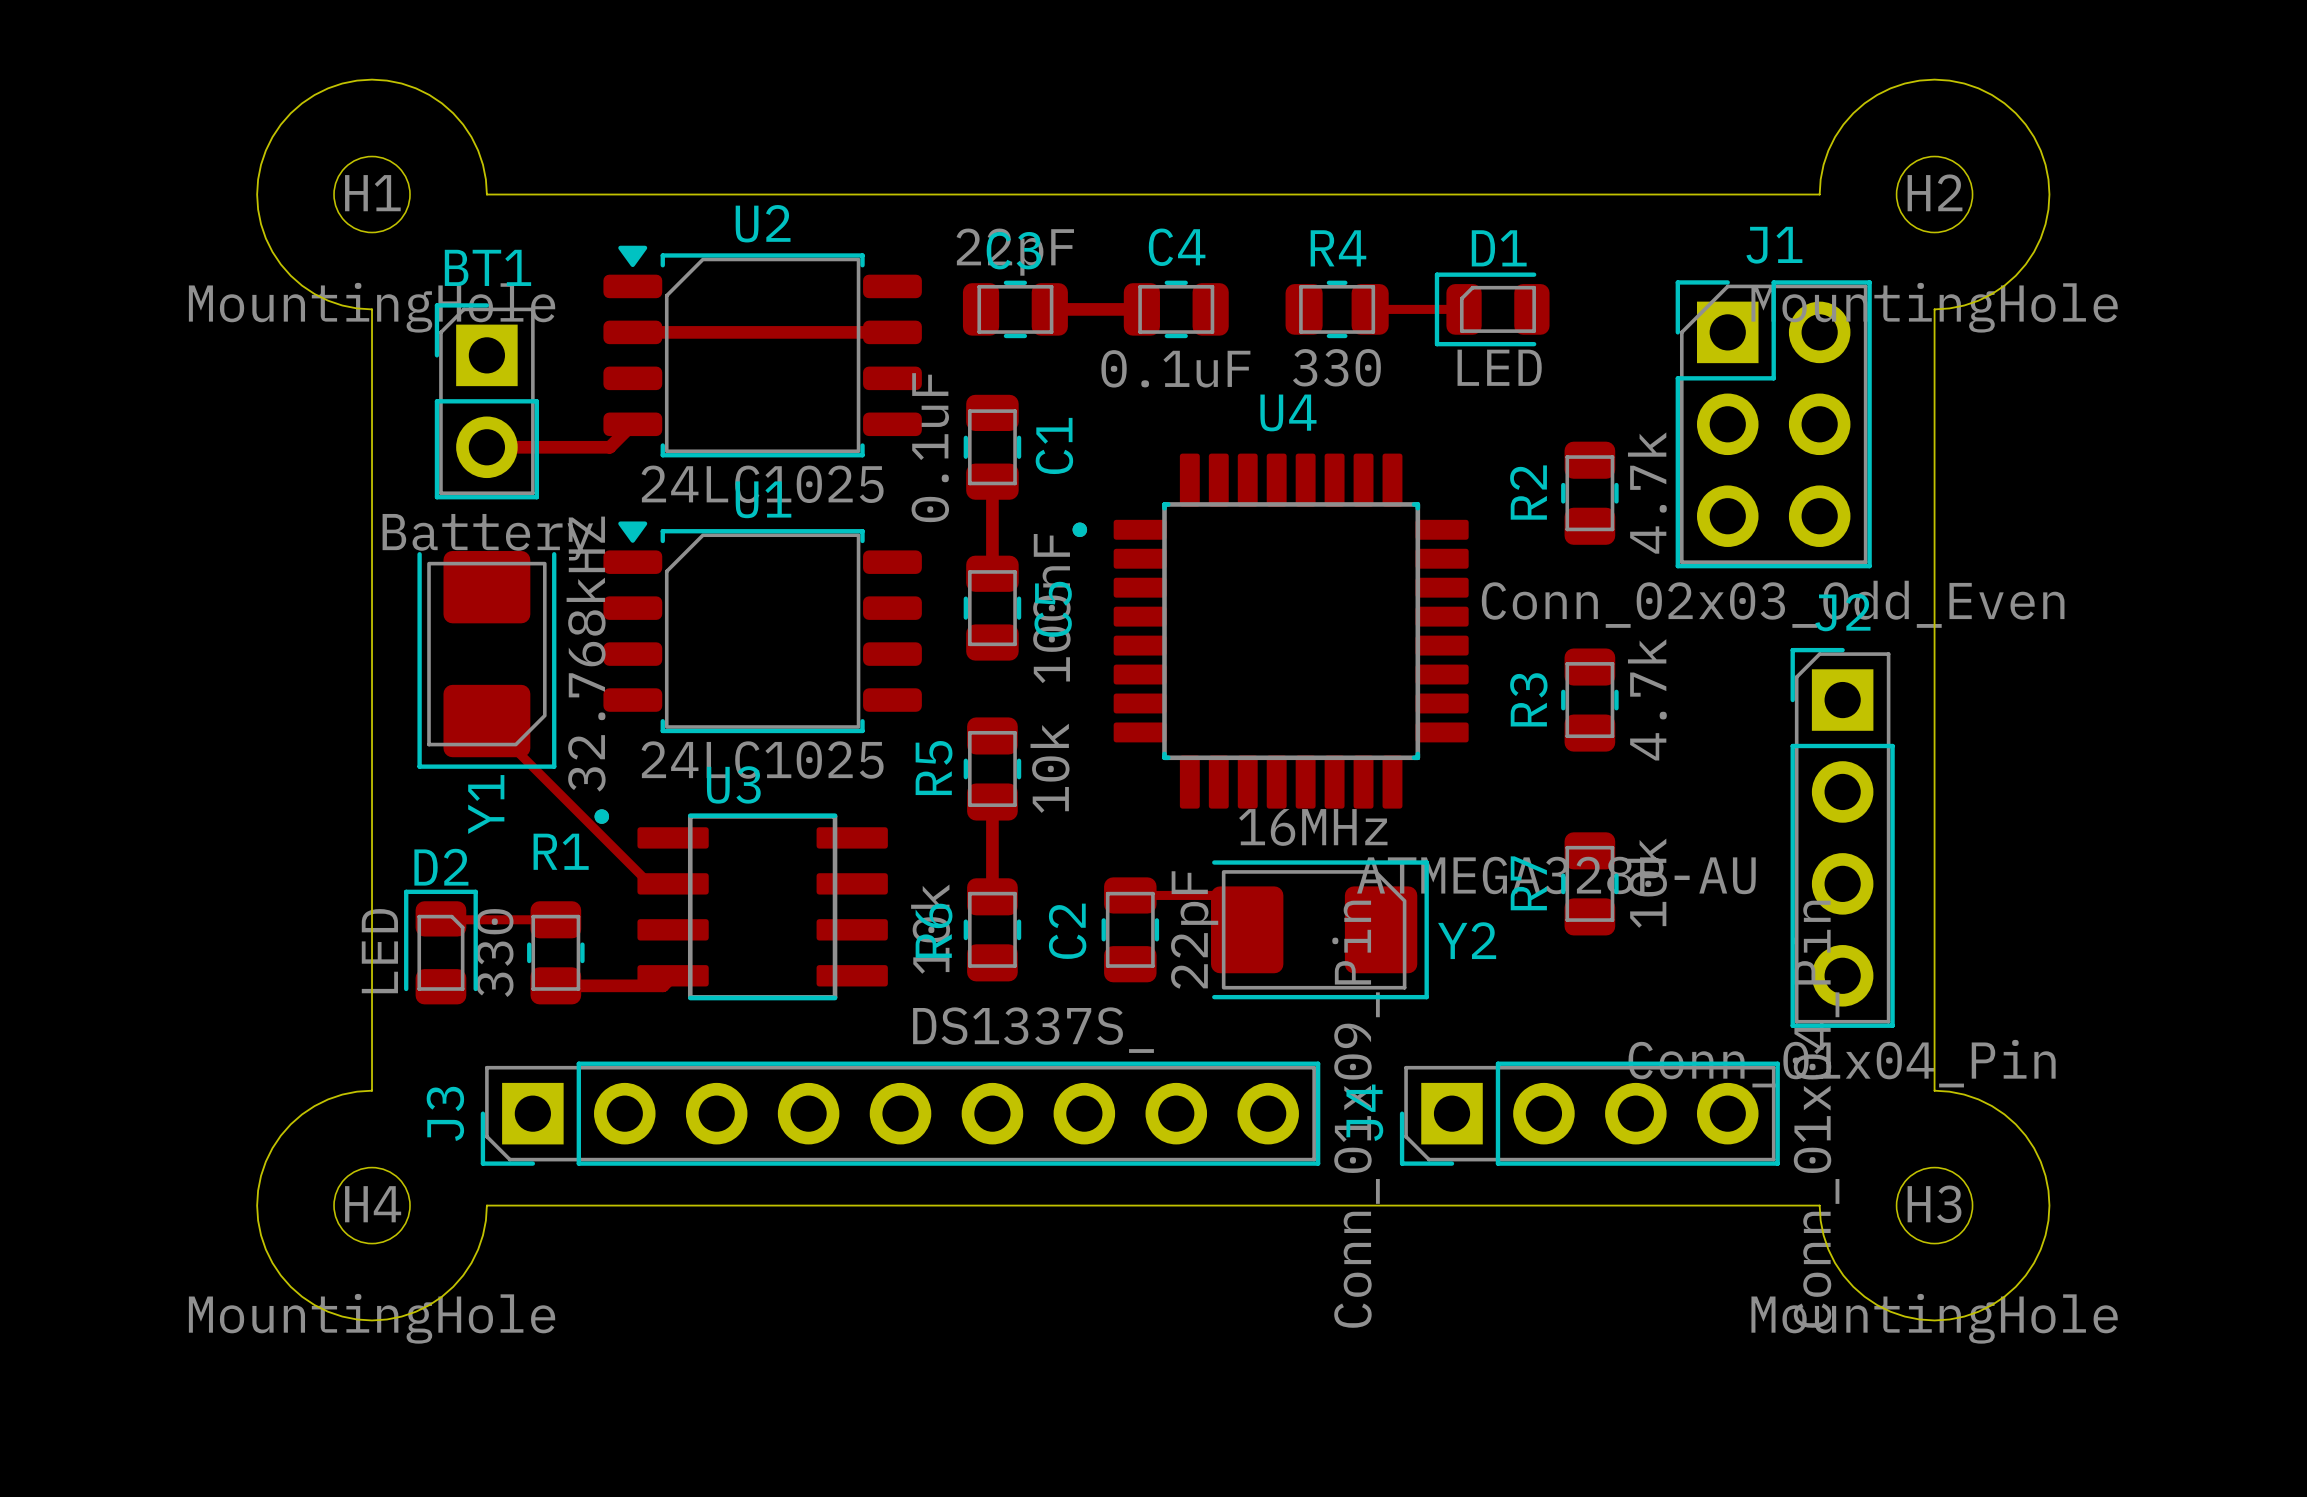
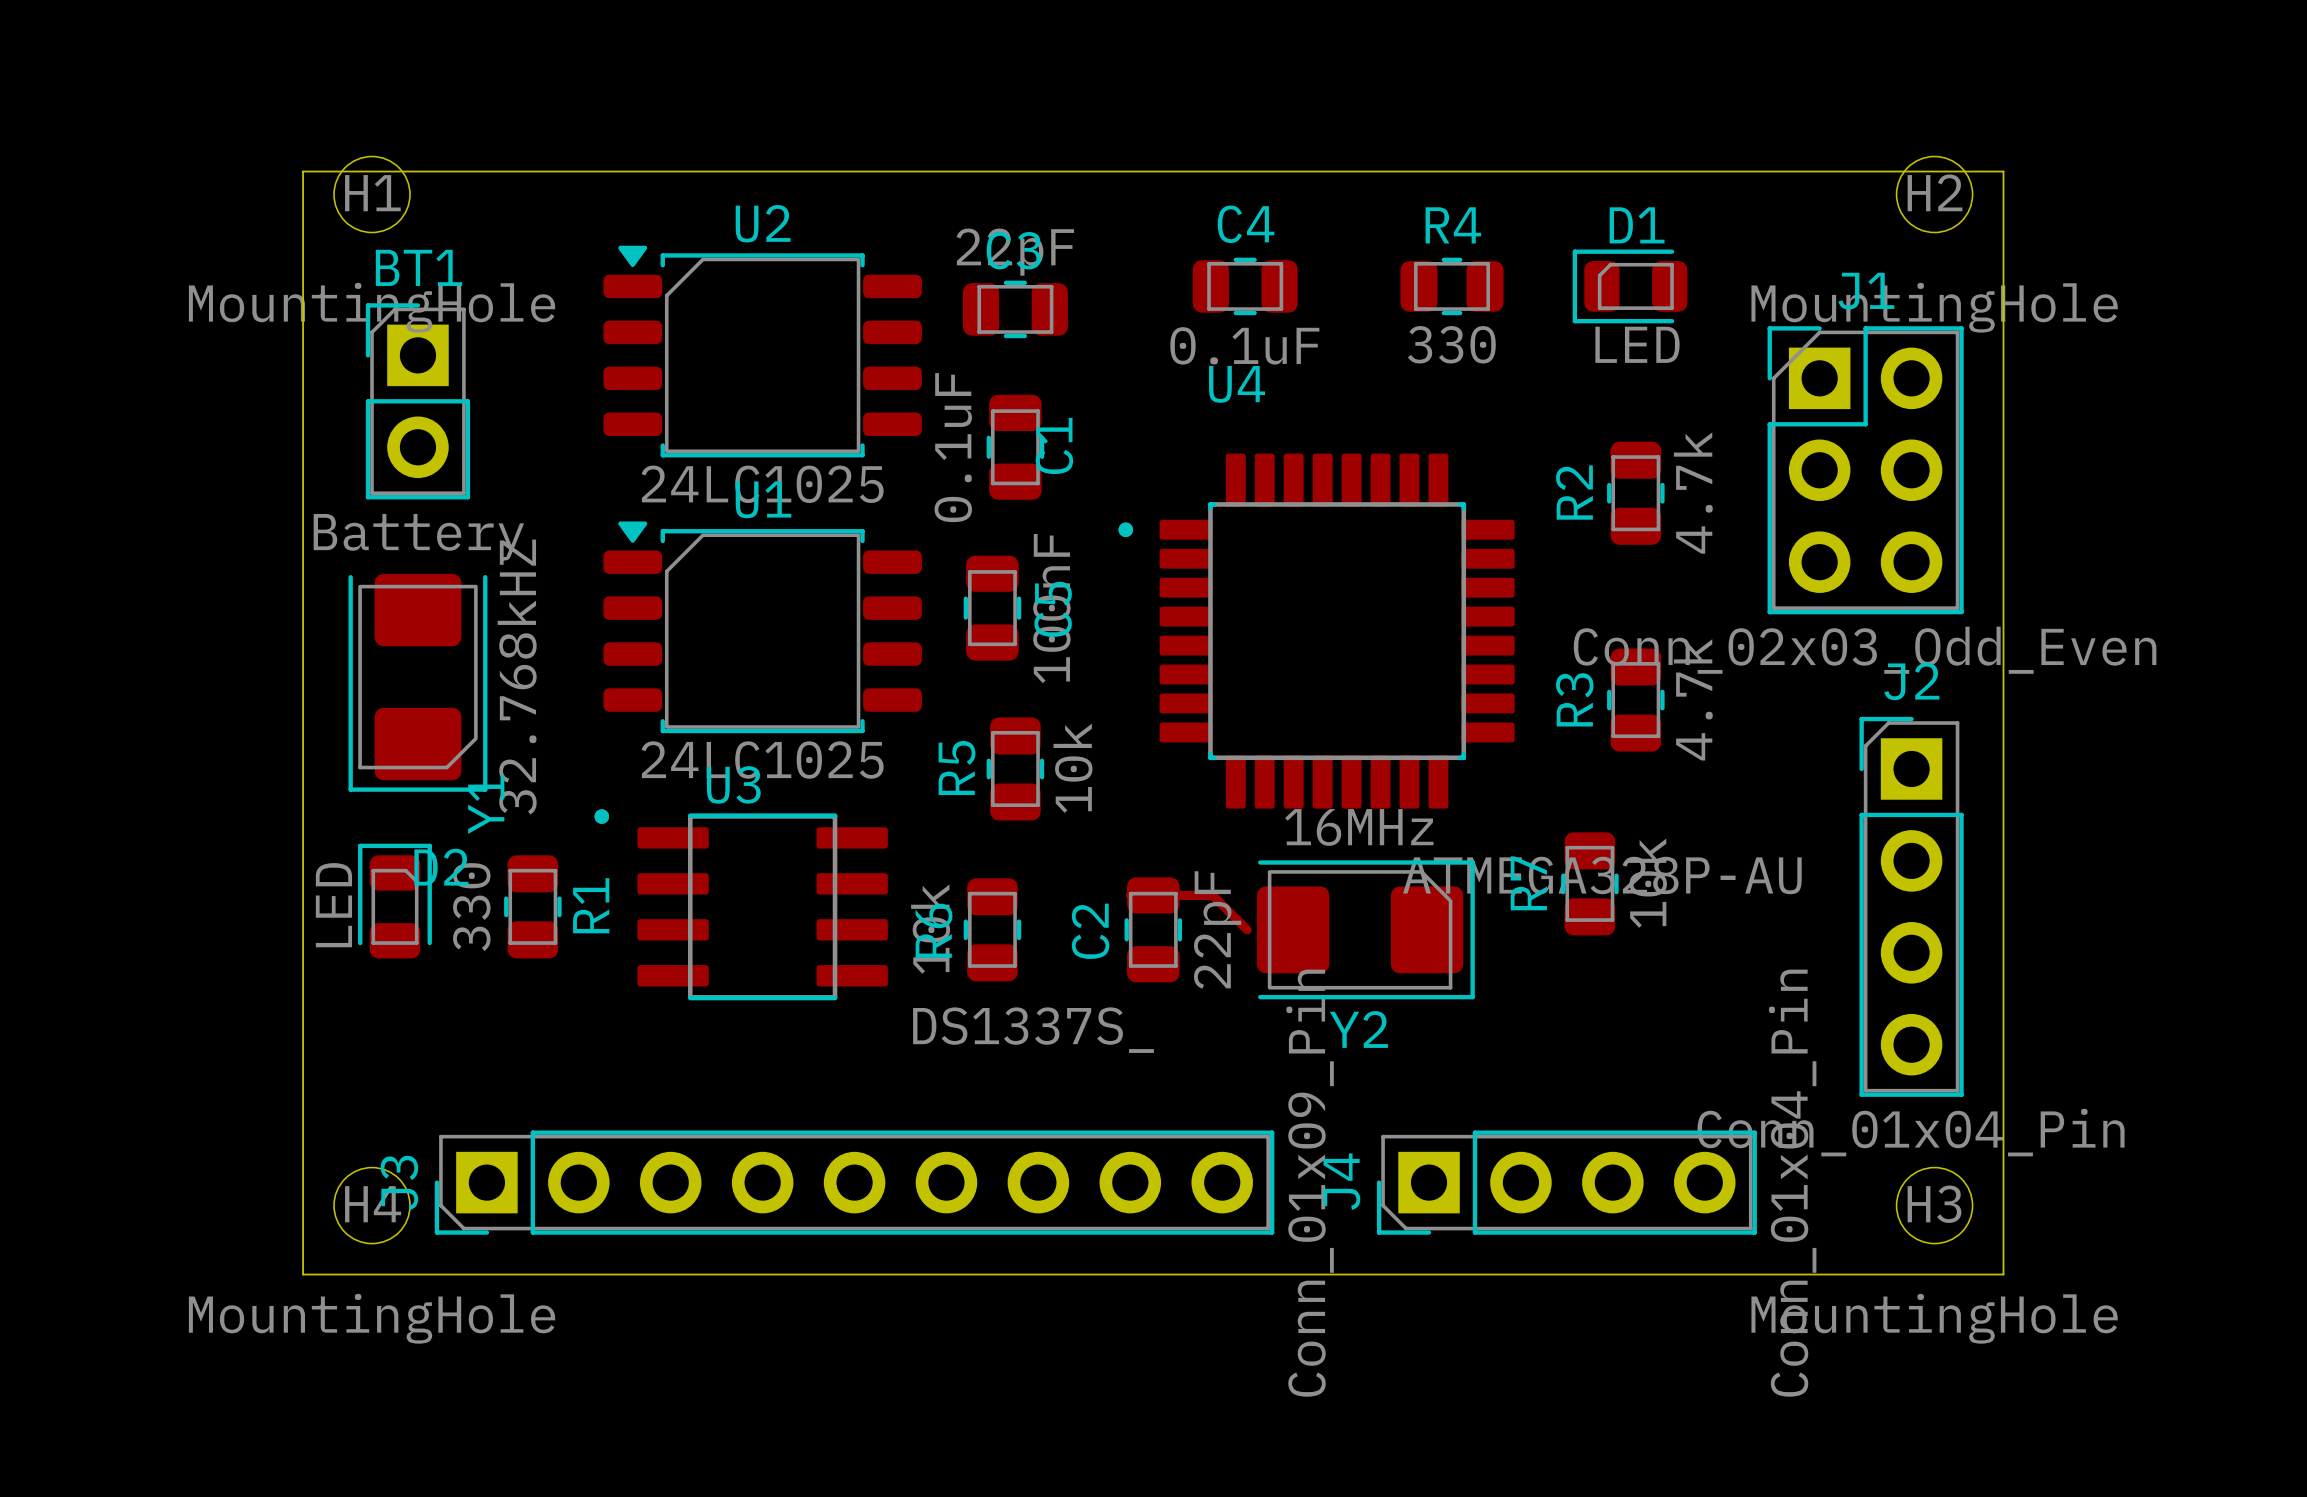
board edge: (486, 194) (1819, 194) (1820, 179) (1828, 150) (1843, 124) (1864, 103) (1890, 88) (1919, 80) (1949, 80) (1978, 88) (2004, 103) (2025, 124) (2040, 150) (2045, 164) (2049, 194) (2045, 224) (2034, 251) (2015, 275) (2004, 285) (1978, 300) (1964, 305) (1934, 309) (1934, 1090) (1964, 1094) (1992, 1106) (2015, 1124) (2025, 1135) (2040, 1161) (2048, 1190) (2048, 1220) (2040, 1249) (2025, 1275) (2004, 1296) (1992, 1305) (1964, 1316) (1934, 1320) (1904, 1316) (1877, 1305) (1853, 1286) (1843, 1275) (1828, 1249) (1823, 1235) (1819, 1205) (486, 1205) (482, 1235) (471, 1263) (463, 1275) (441, 1296) (415, 1311) (387, 1319) (357, 1319) (328, 1311) (302, 1296) (280, 1275) (272, 1263) (261, 1235) (257, 1205) (261, 1175) (272, 1148) (290, 1124) (302, 1114) (314, 1106) (342, 1094) (372, 1090) (372, 309) (342, 305) (328, 300) (314, 294) (290, 275) (272, 251) (265, 238) (258, 209) (258, 179) (265, 150) (272, 137) (290, 113) (314, 95) (328, 88) (357, 80) (372, 79) (401, 83) (415, 88) (429, 95) (453, 113) (471, 137) (478, 150) (485, 179) (486, 194) -> (303, 171) (303, 1274) (2003, 1274) (2003, 171) (303, 171)
top track: (1049, 309) (1141, 309) -> none
C4 position: (1176, 309) -> (1245, 286)
R4 position: (1337, 309) -> (1452, 286)
top track: (1370, 309) (1464, 309) -> none
D1 position: (1492, 309) -> (1630, 286)
top track: (632, 332) (892, 332) -> none
BT1 position: (486, 401) -> (417, 401)
U4 name position: U4 (1288, 412) -> U4 (1237, 384)
top track: (632, 424) (609, 447) (486, 447) -> none
J1 position: (1773, 424) -> (1865, 470)
C1 position: (992, 447) -> (1015, 447)
top track: (992, 481) (992, 573) -> none
R2 position: (1589, 493) -> (1635, 493)
U4 position: (1270, 631) -> (1316, 631)
Y1 position: (486, 659) -> (417, 682)
R3 position: (1589, 700) -> (1635, 700)
top track: (486, 721) (649, 883) (673, 883) -> none
R5 position: (992, 768) -> (1015, 768)
top track: (992, 802) (992, 896) -> none
J2 position: (1842, 837) -> (1911, 906)
R1 name rotation: 0° (561, 851) -> 90° counterclockwise (591, 905)
top track: (440, 918) (555, 919) -> none
C2 position: (1130, 929) -> (1153, 929)
Y2 position: (1319, 929) -> (1365, 929)
Y2 name position: Y2 (1467, 940) -> Y2 (1358, 1029)
D2 position: (440, 947) -> (394, 901)
R1 position: (555, 952) -> (532, 906)
top track: (673, 975) (663, 985) (555, 985) -> none
J3 position: (900, 1113) -> (854, 1182)
J4 position: (1589, 1113) -> (1566, 1182)

